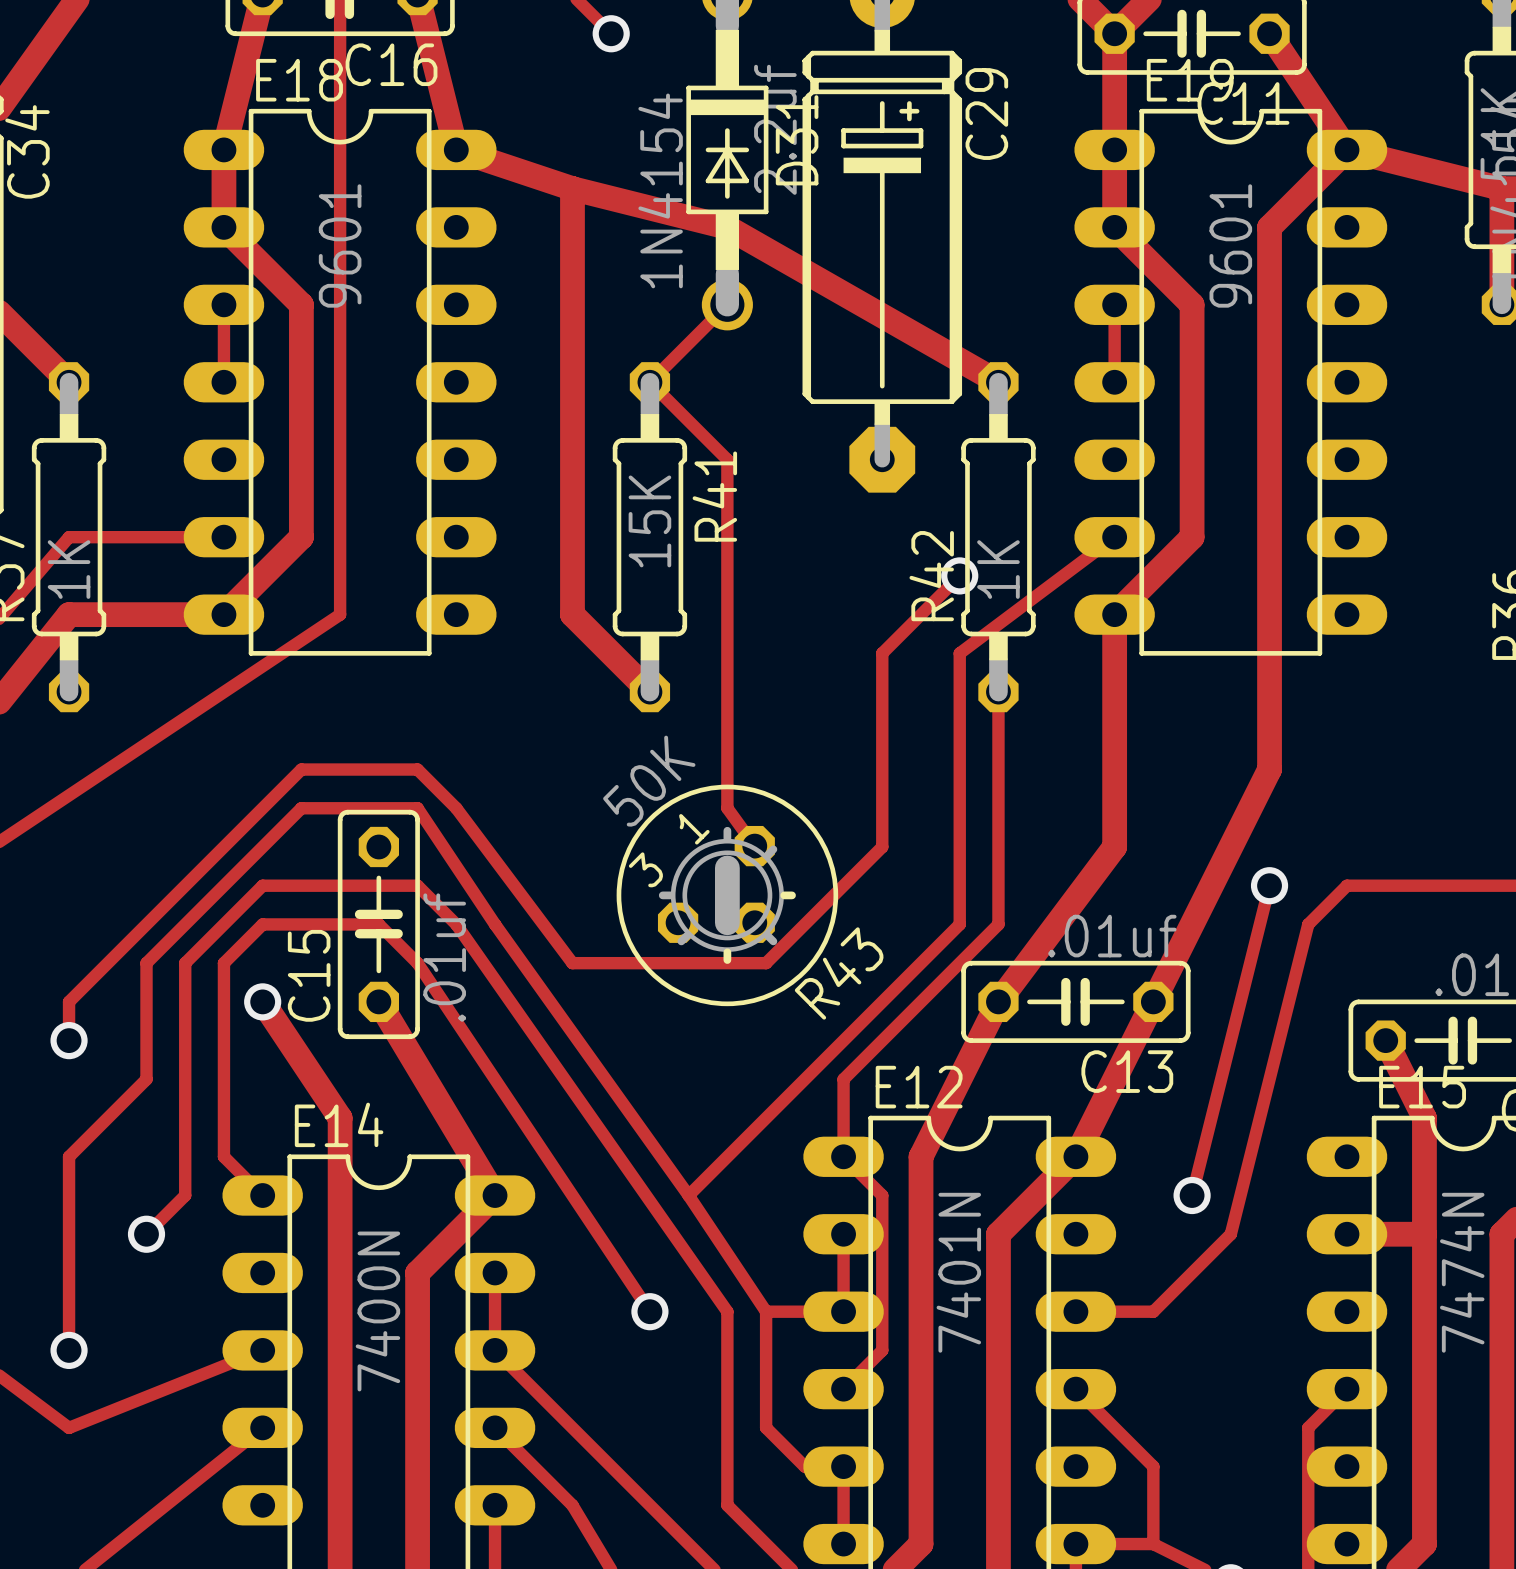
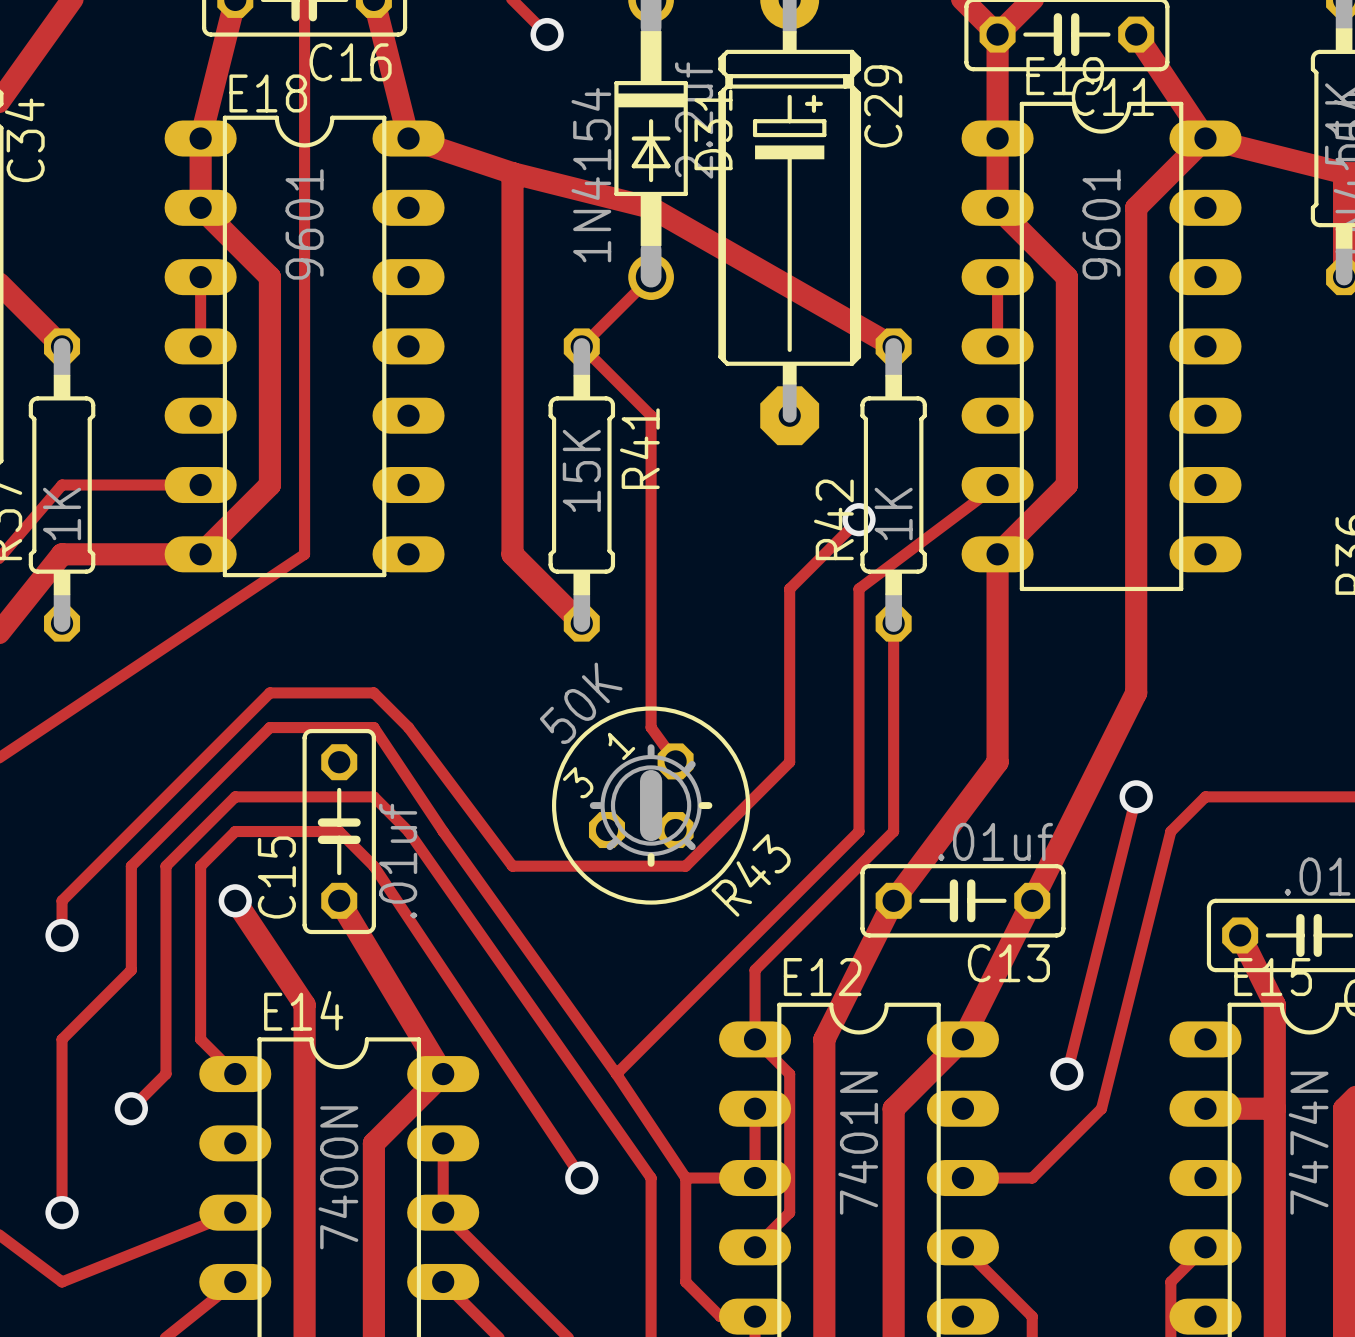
E18 name position: E18 (299, 80) -> E18 (268, 93)
E18 footprint: [183, 108, 497, 656] -> [164, 115, 445, 578]

